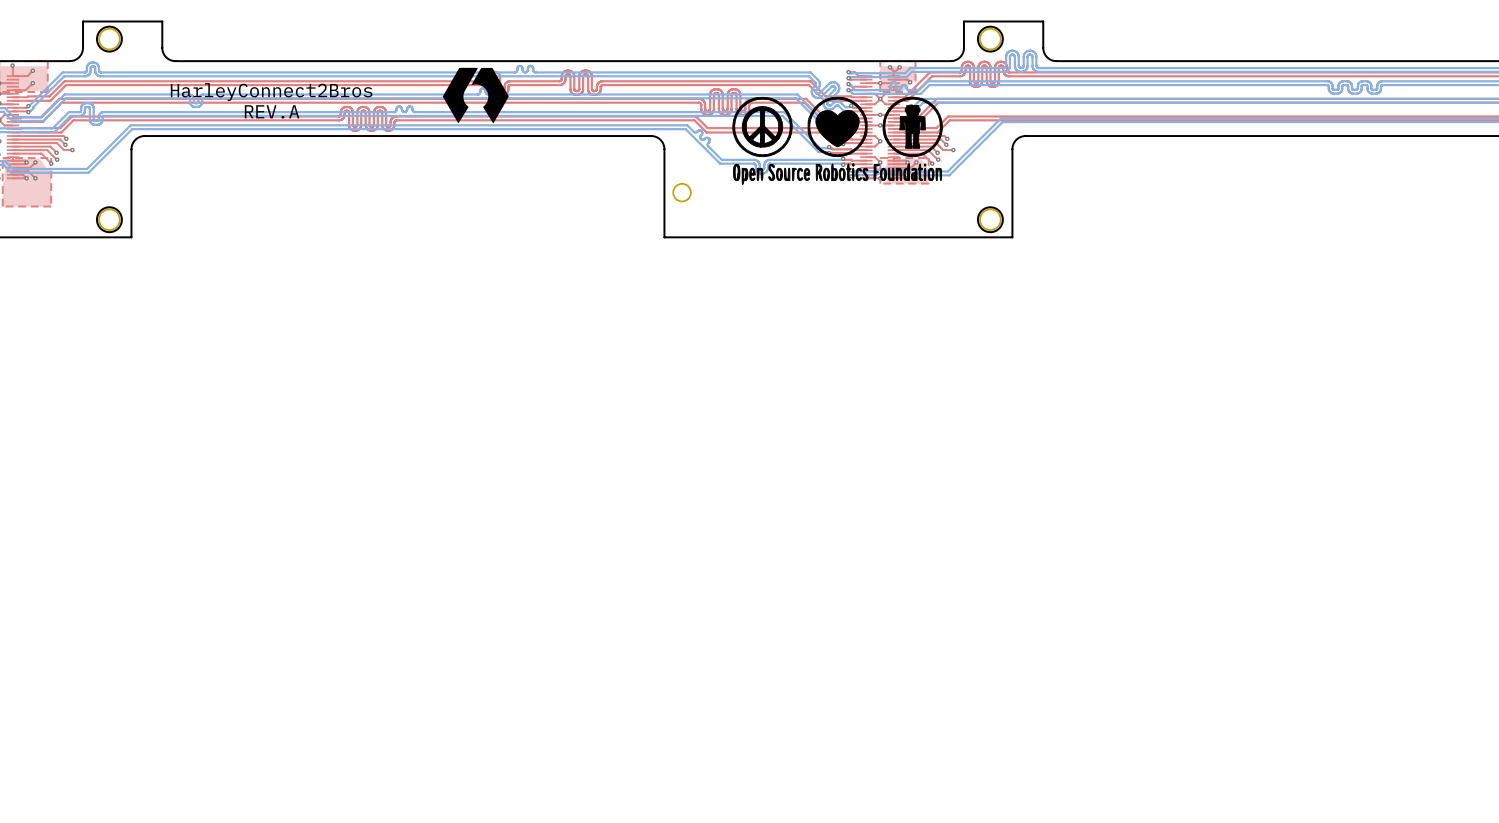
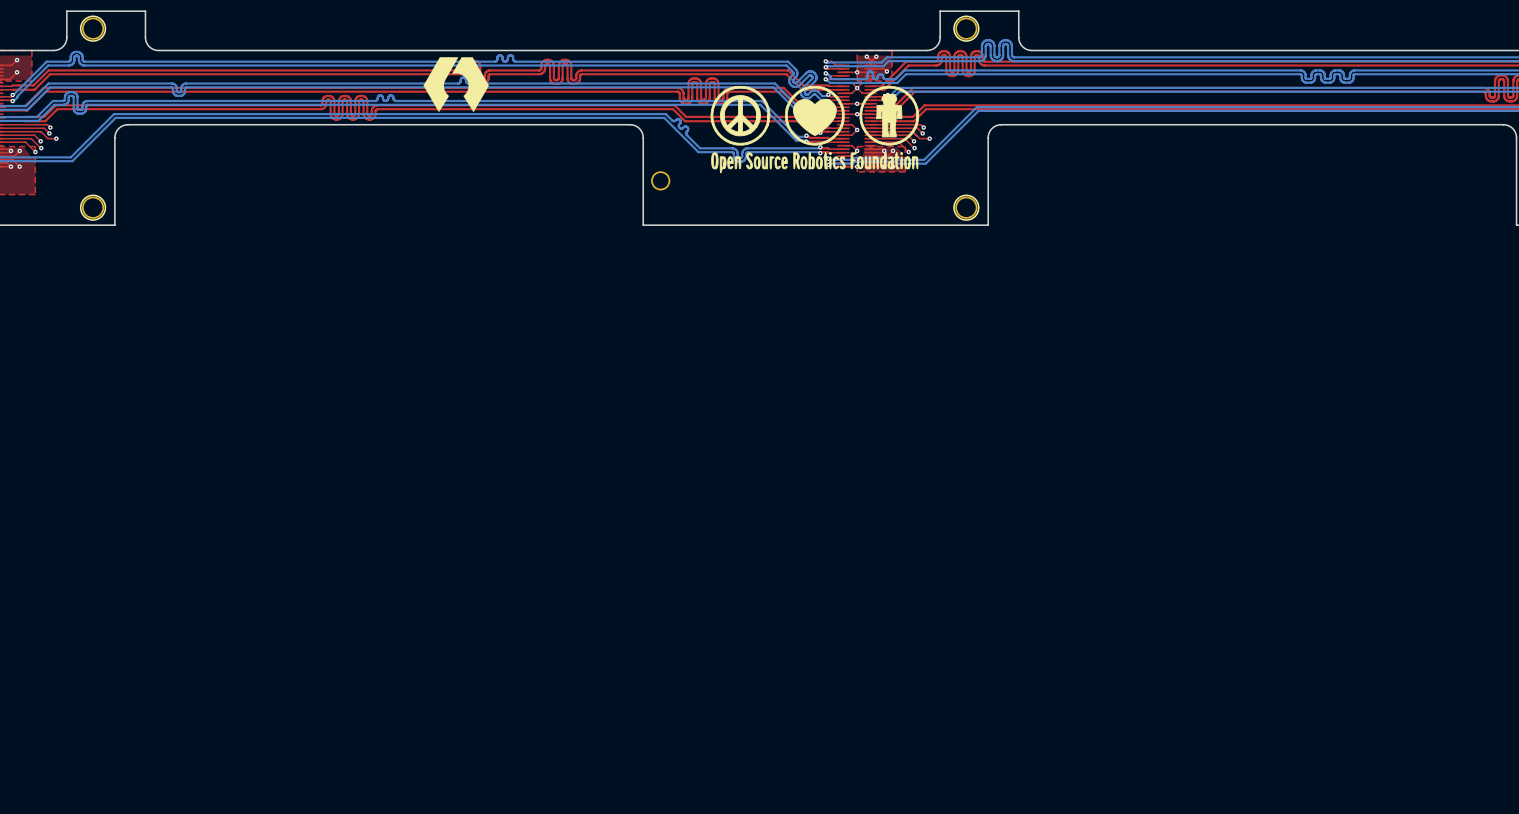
text: HarleyConnect2Bros (271, 92) -> none
text: REV.A (272, 111) -> none

